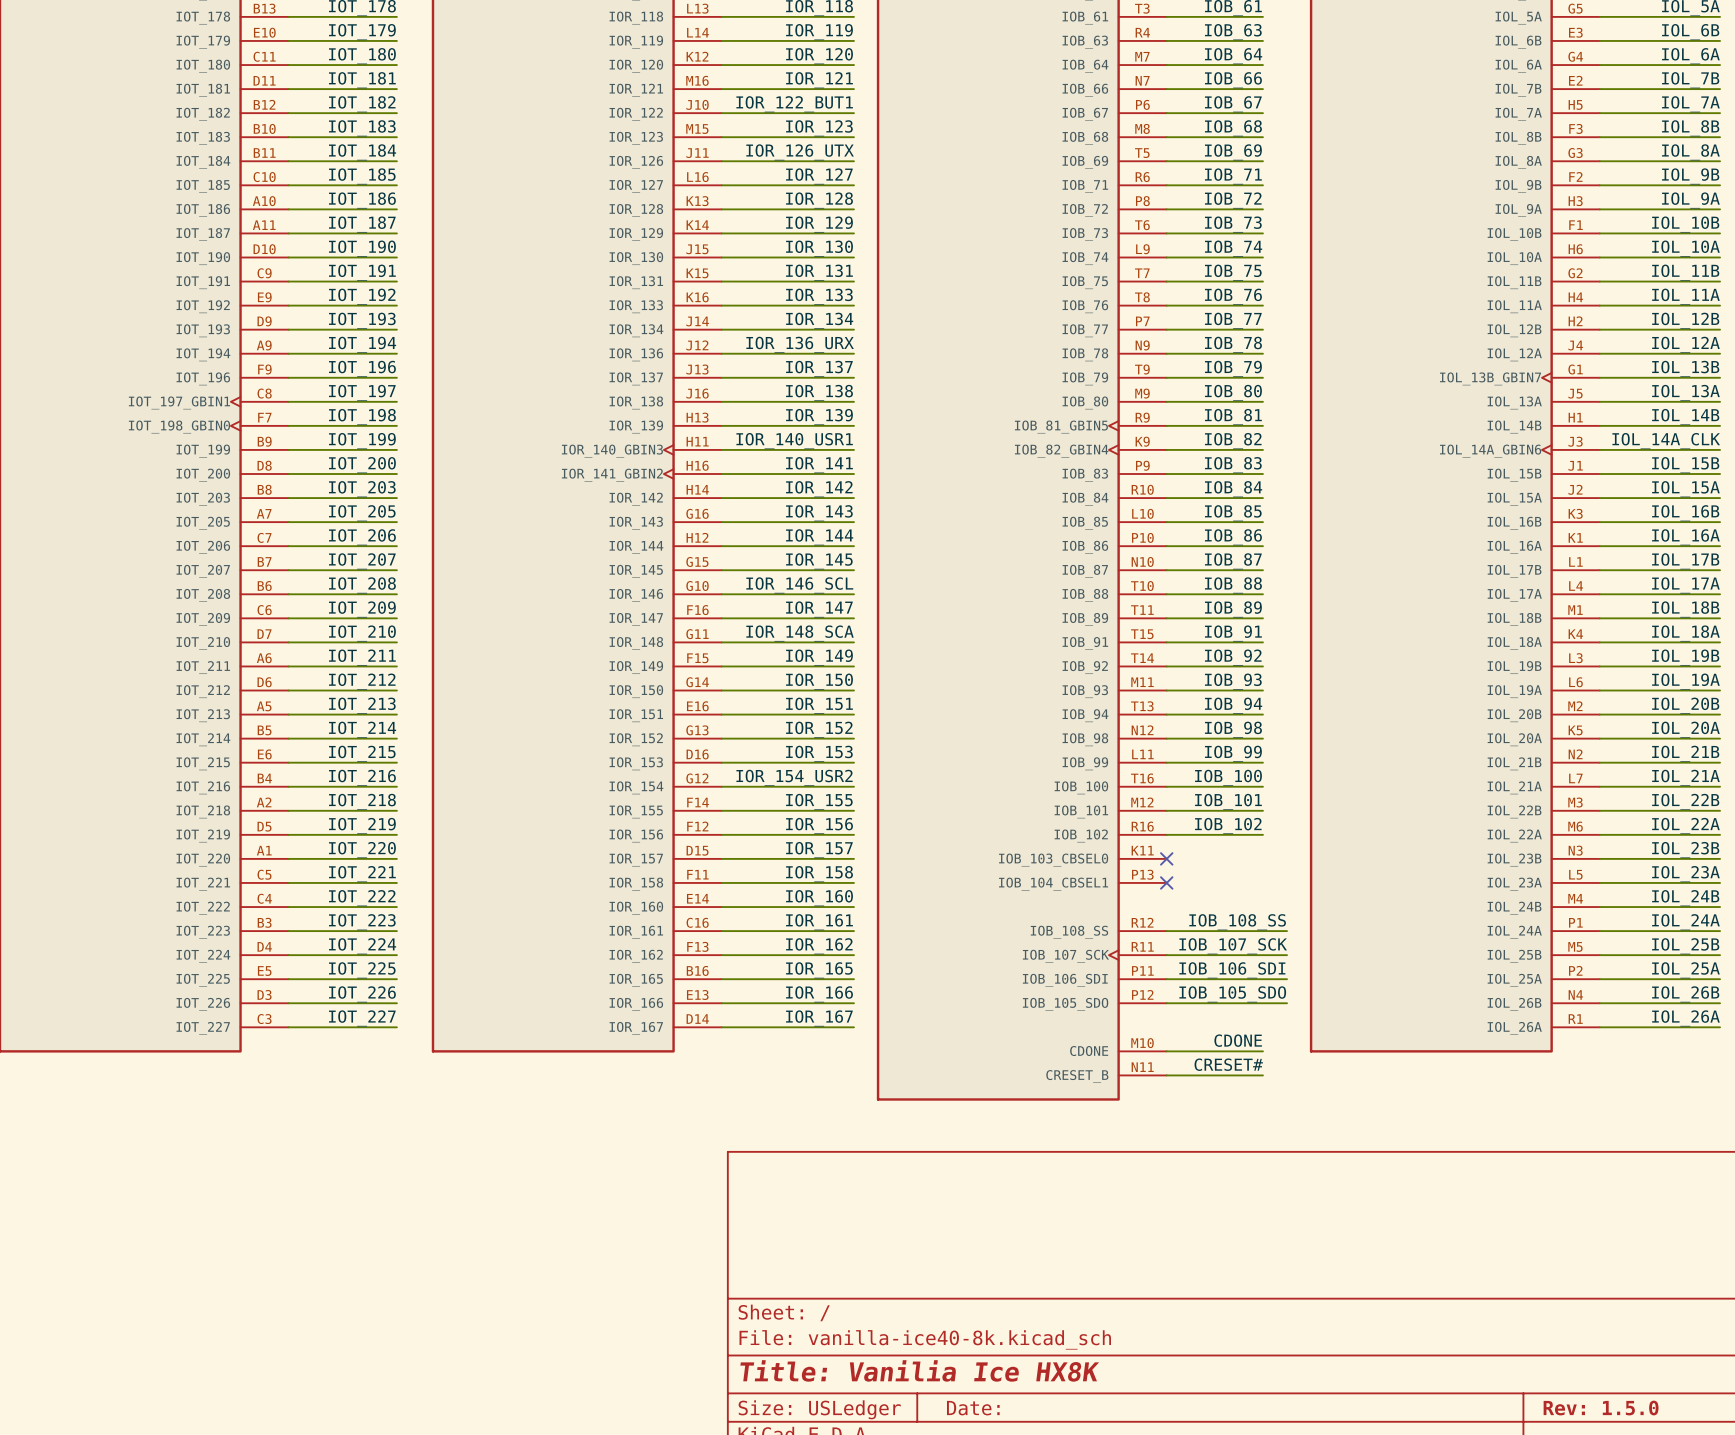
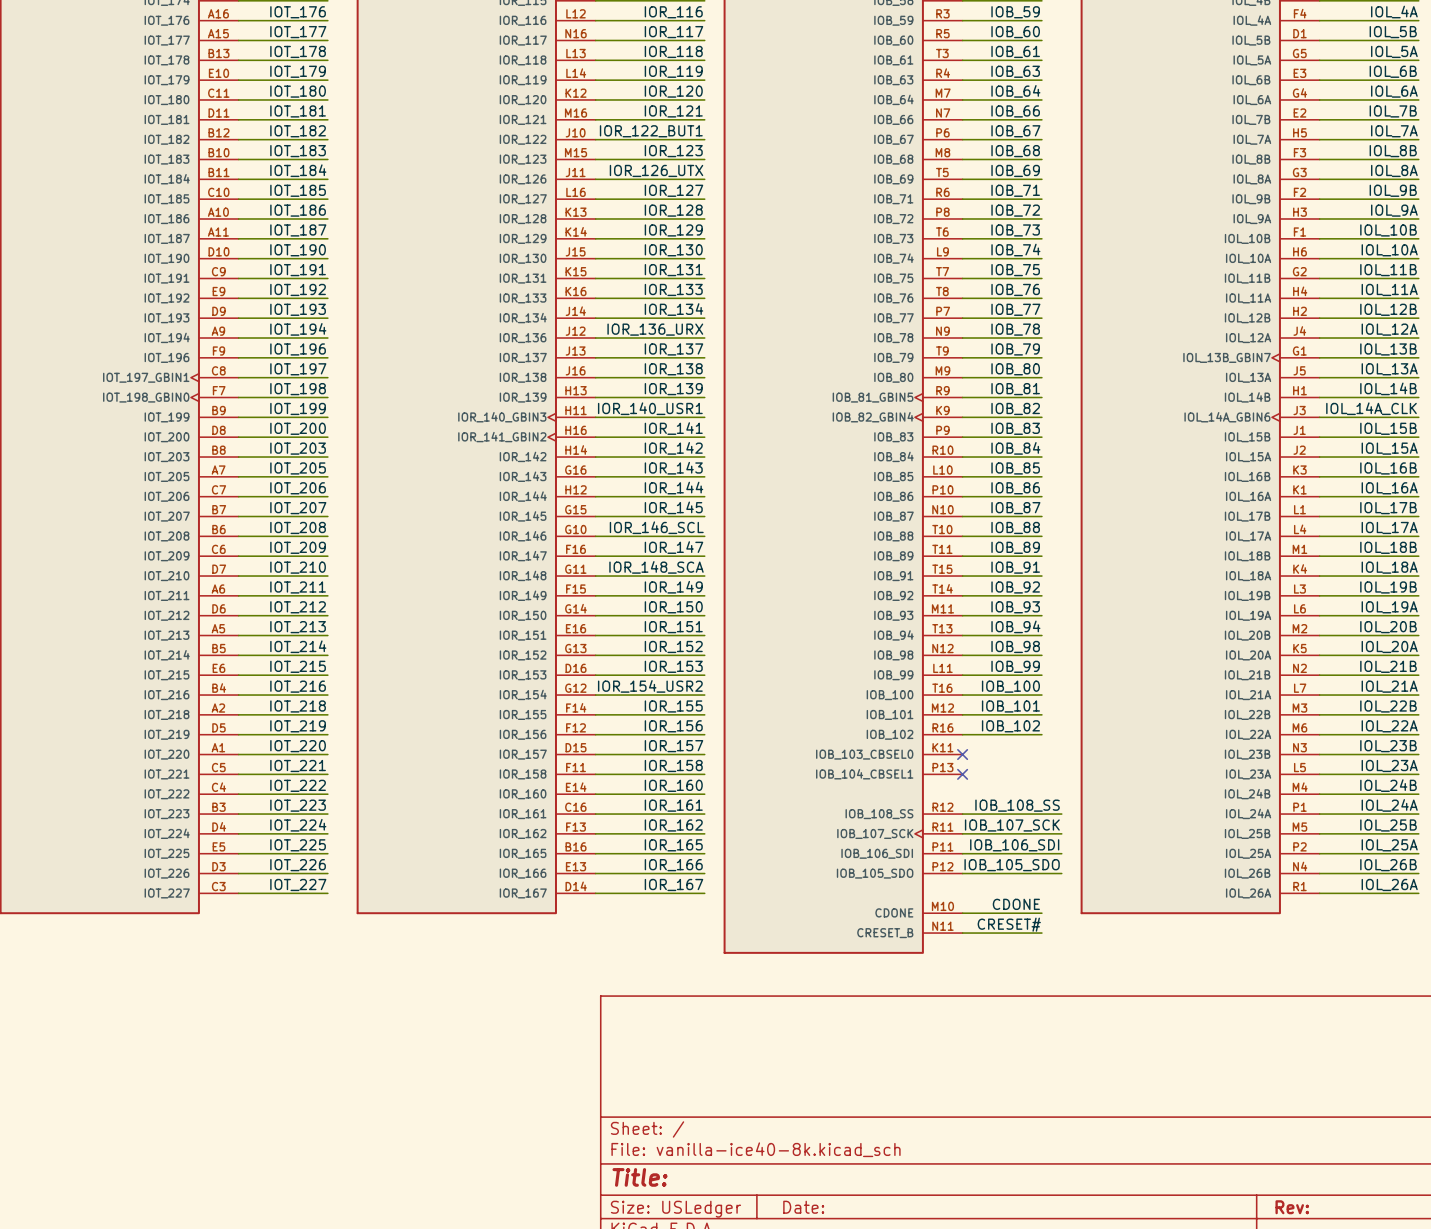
title block: Title: Vanilia Ice HX8K (919, 1370) -> Title: (640, 1177)
title block: Rev: 1.5.0 (1601, 1408) -> Rev: (1292, 1207)

